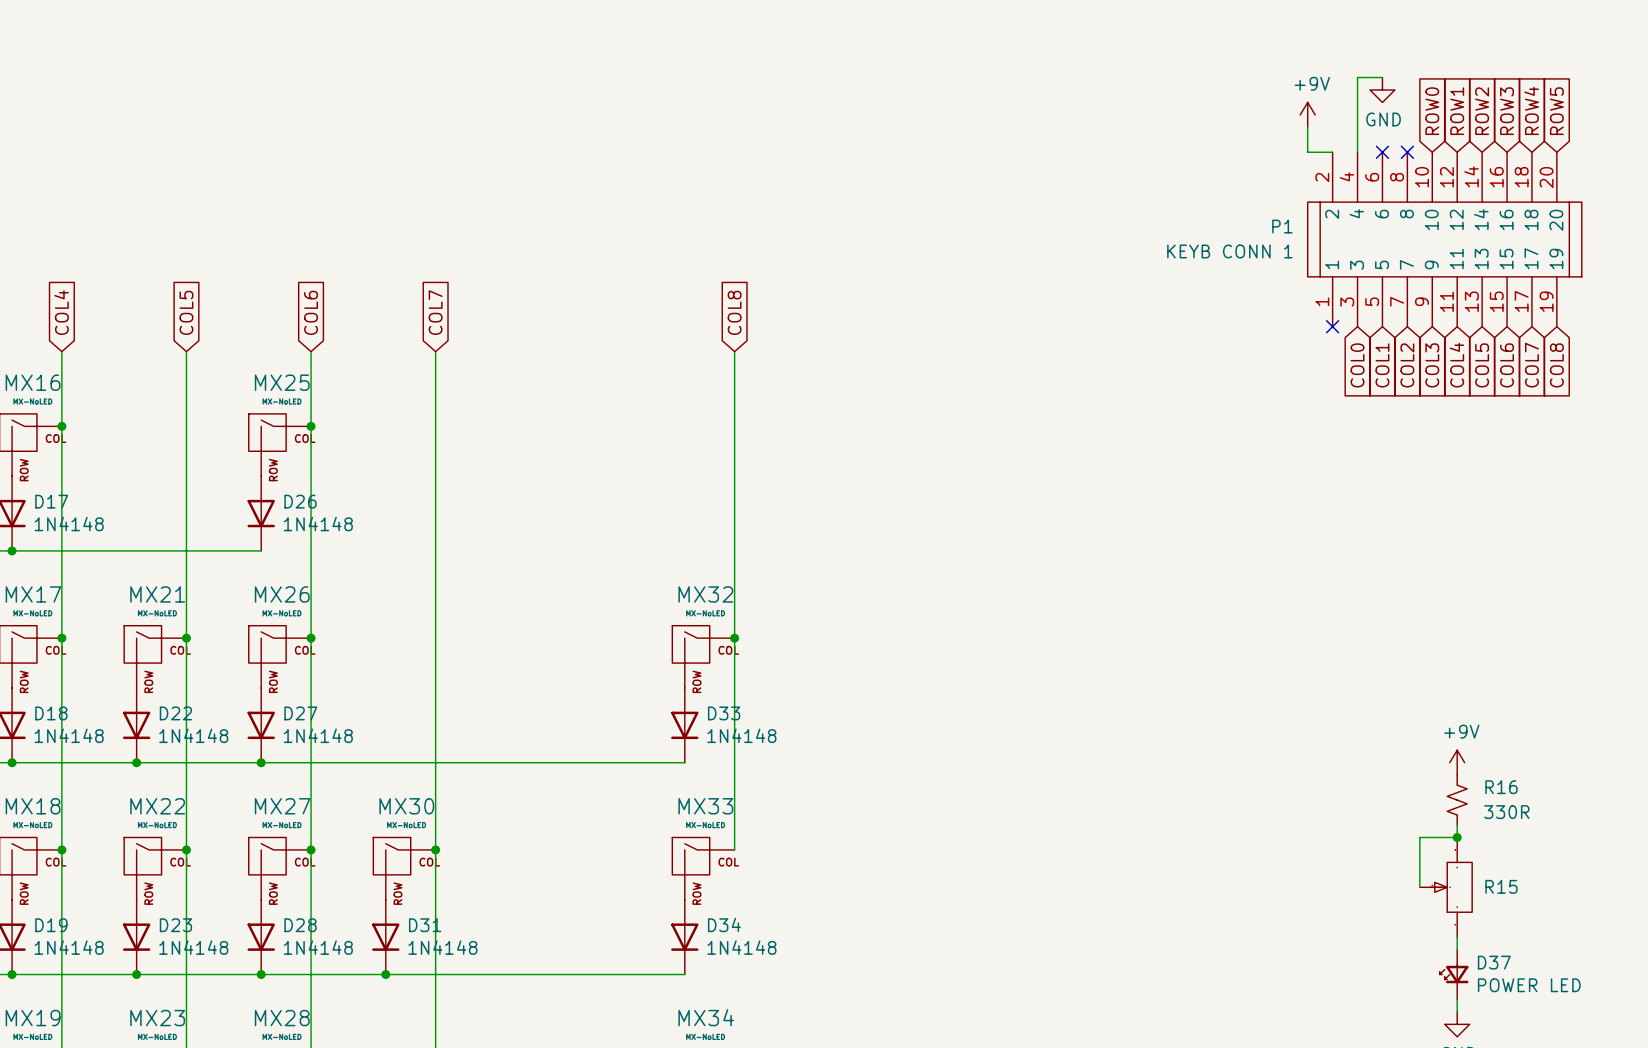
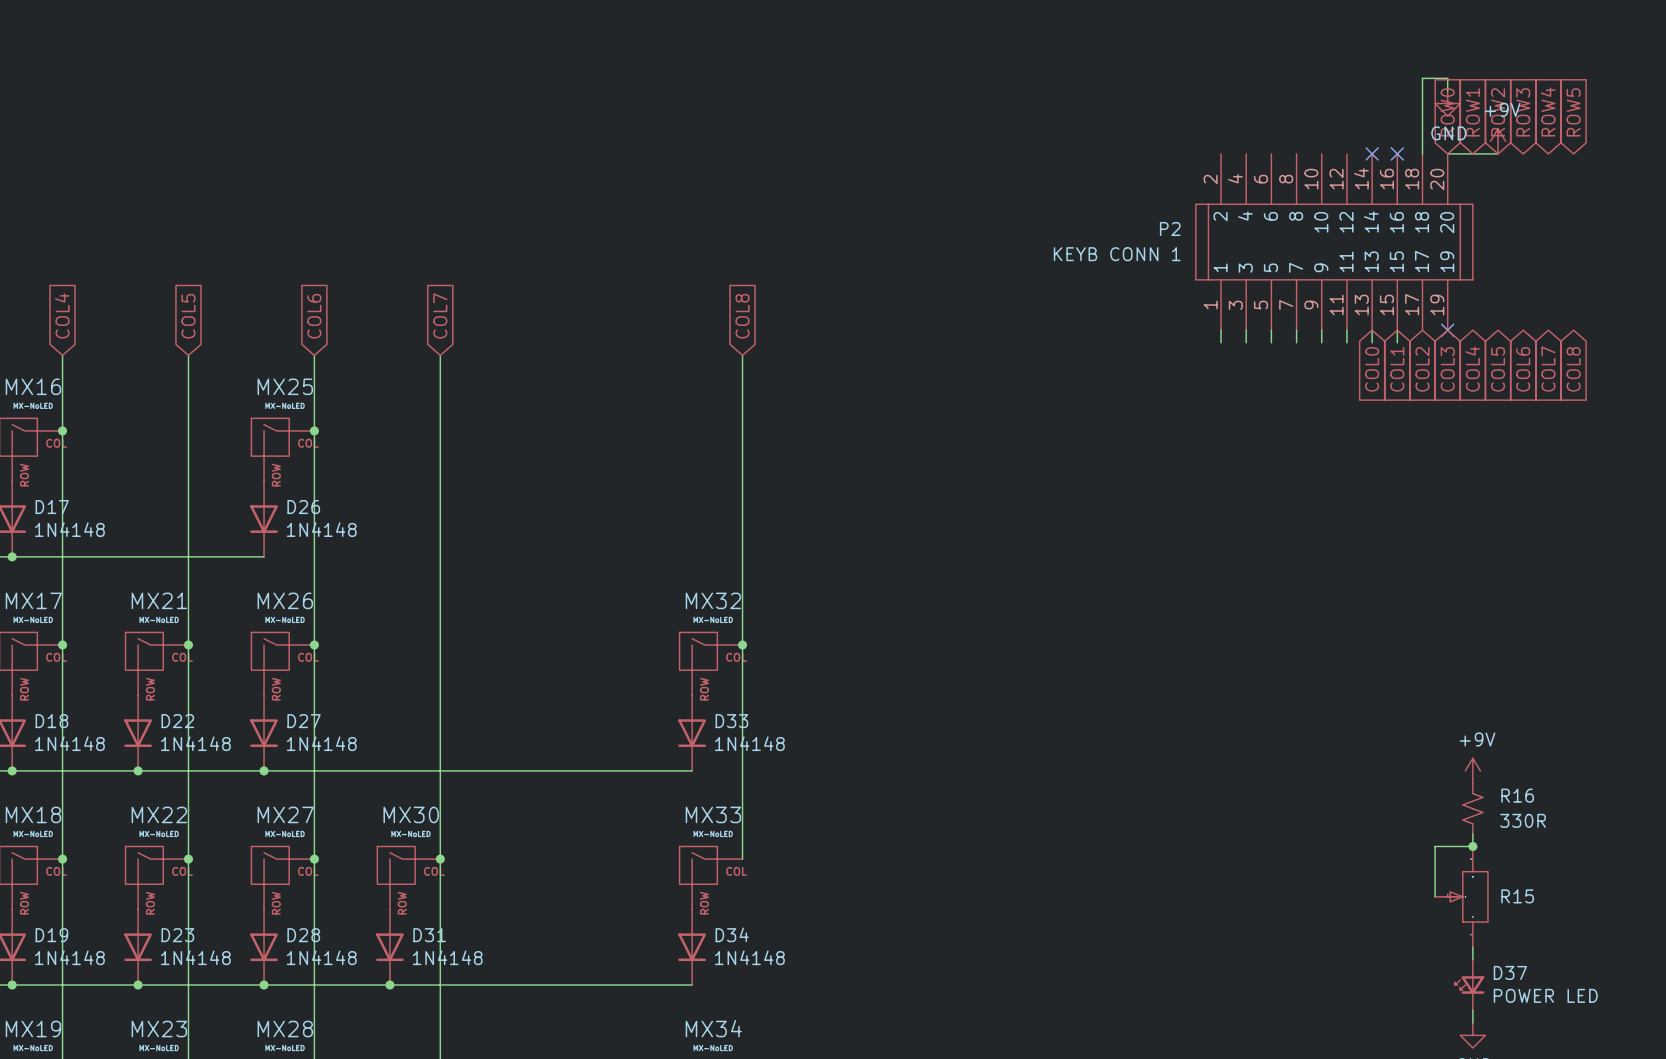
wire: (1382, 77) (1357, 77) (1357, 152) -> none
power symbol position: GND (1382, 89) -> GND (1447, 103)
wire: none -> (1447, 90) (1447, 78) (1422, 78) (1422, 153)
power symbol position: +9V (1307, 114) -> +9V (1498, 141)
wire: (1307, 127) (1307, 152) (1332, 152) -> none
no-connect mark position: (1407, 152) -> (1372, 153)
wire: none -> (1447, 153) (1498, 153)
P2: none -> KEYB CONN 1 (1334, 242)
P1: KEYB CONN 1 (1444, 239) -> none
wire: none -> (1221, 330) (1221, 342)
wire: none -> (1246, 330) (1246, 342)
wire: none -> (1271, 330) (1271, 342)
wire: none -> (1296, 330) (1296, 342)
wire: none -> (1321, 330) (1321, 342)
wire: none -> (1346, 330) (1346, 342)
no-connect mark: (1332, 326) -> none
wire: none -> (1372, 330) (1372, 342)
wire: none -> (1397, 330) (1397, 342)
no-connect mark: none -> (1447, 330)

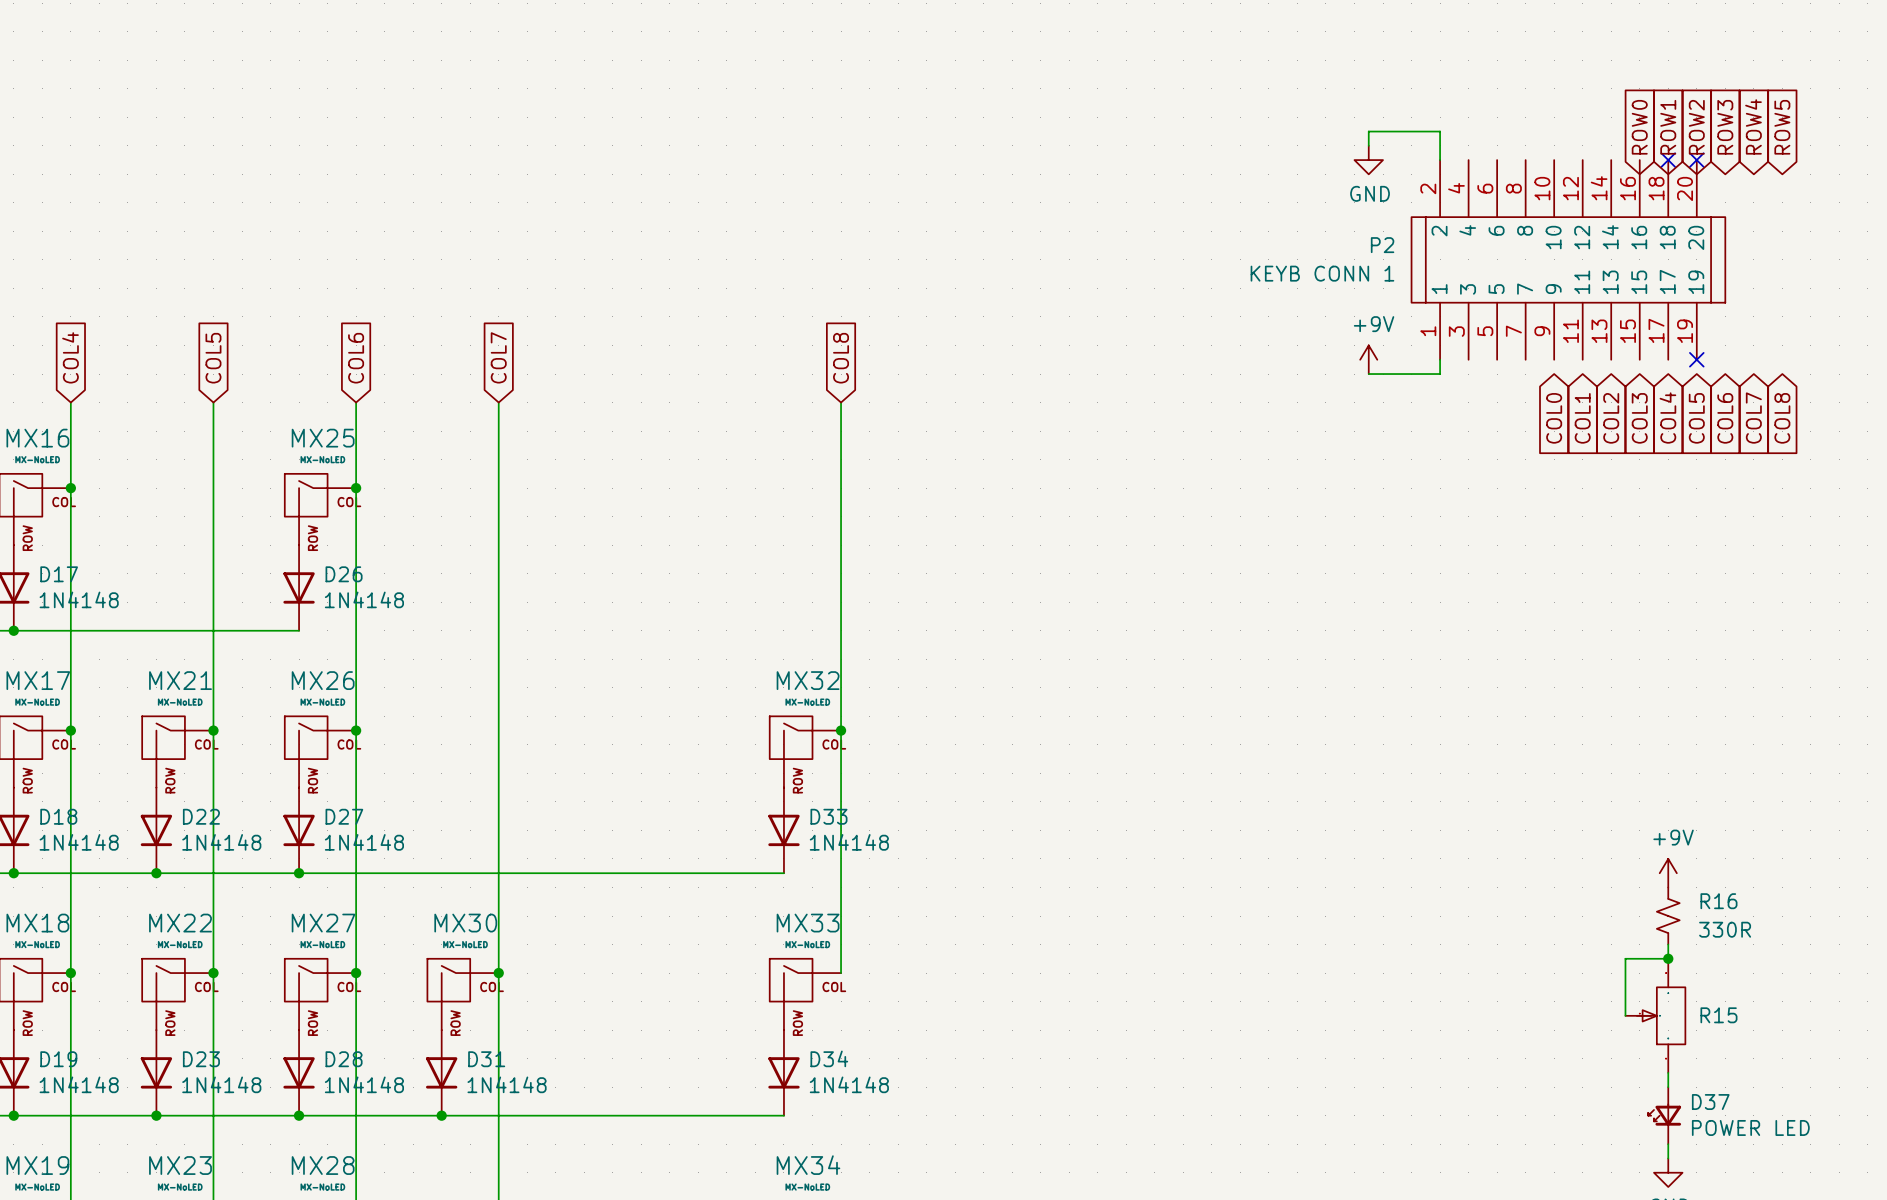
wire: (1447, 90) (1447, 78) (1422, 78) (1422, 153) -> none
power symbol position: GND (1447, 103) -> GND (1368, 160)
wire: none -> (1368, 145) (1368, 131) (1440, 131) (1440, 160)
no-connect mark: none -> (1668, 160)
no-connect mark: none -> (1696, 160)
power symbol: +9V (1498, 141) -> none
no-connect mark: (1372, 153) -> none
no-connect mark: (1397, 153) -> none
wire: (1447, 153) (1498, 153) -> none
P2 position: (1334, 242) -> (1568, 259)
power symbol: none -> +9V (1368, 359)
wire: none -> (1440, 359) (1440, 374) (1368, 374)
wire: (1221, 330) (1221, 342) -> none
wire: (1246, 330) (1246, 342) -> none
wire: (1271, 330) (1271, 342) -> none
wire: (1296, 330) (1296, 342) -> none
wire: (1321, 330) (1321, 342) -> none
wire: (1346, 330) (1346, 342) -> none
wire: (1372, 330) (1372, 342) -> none
wire: (1397, 330) (1397, 342) -> none
no-connect mark position: (1447, 330) -> (1696, 359)

